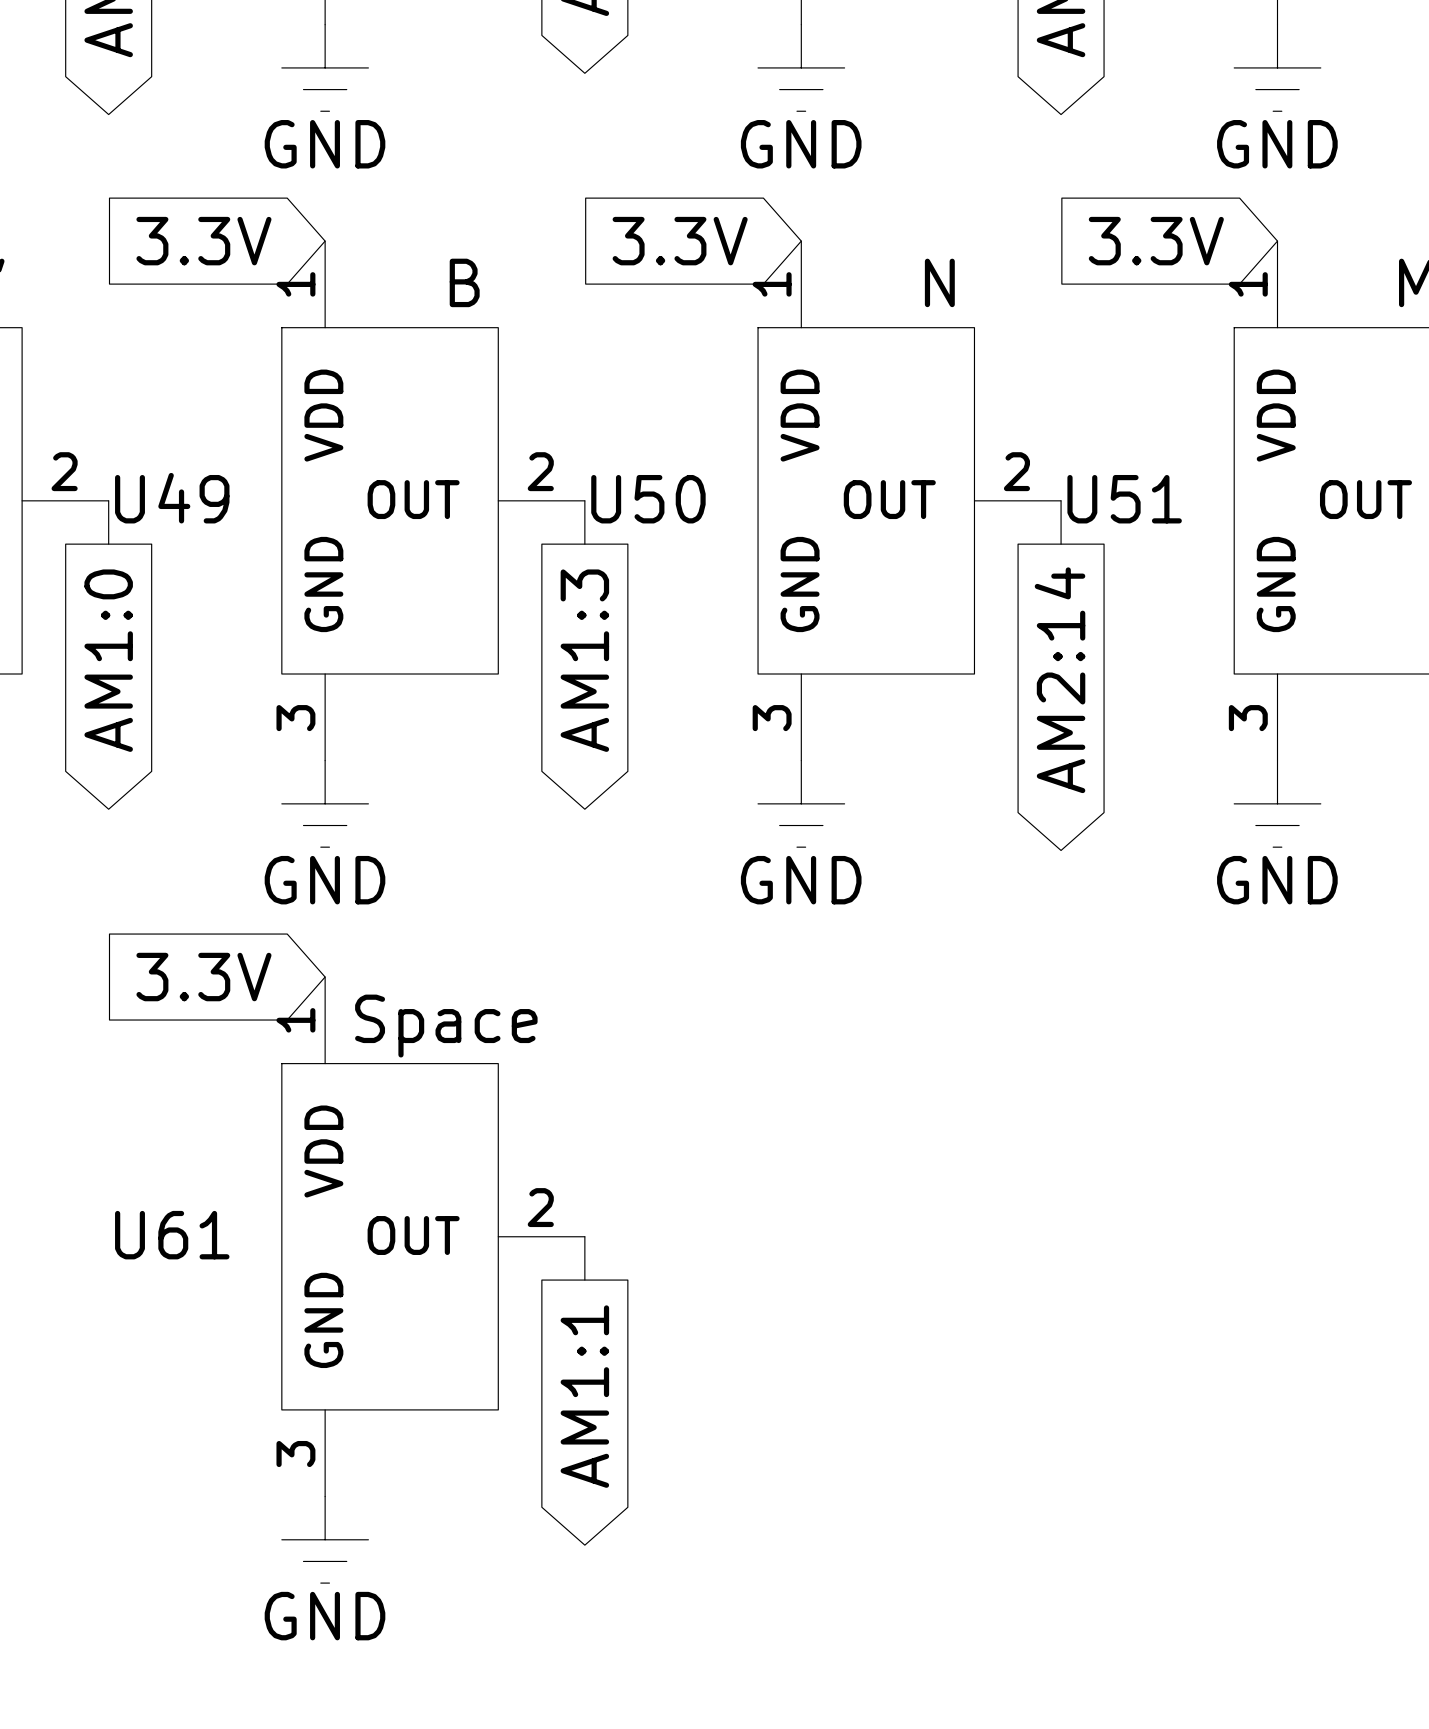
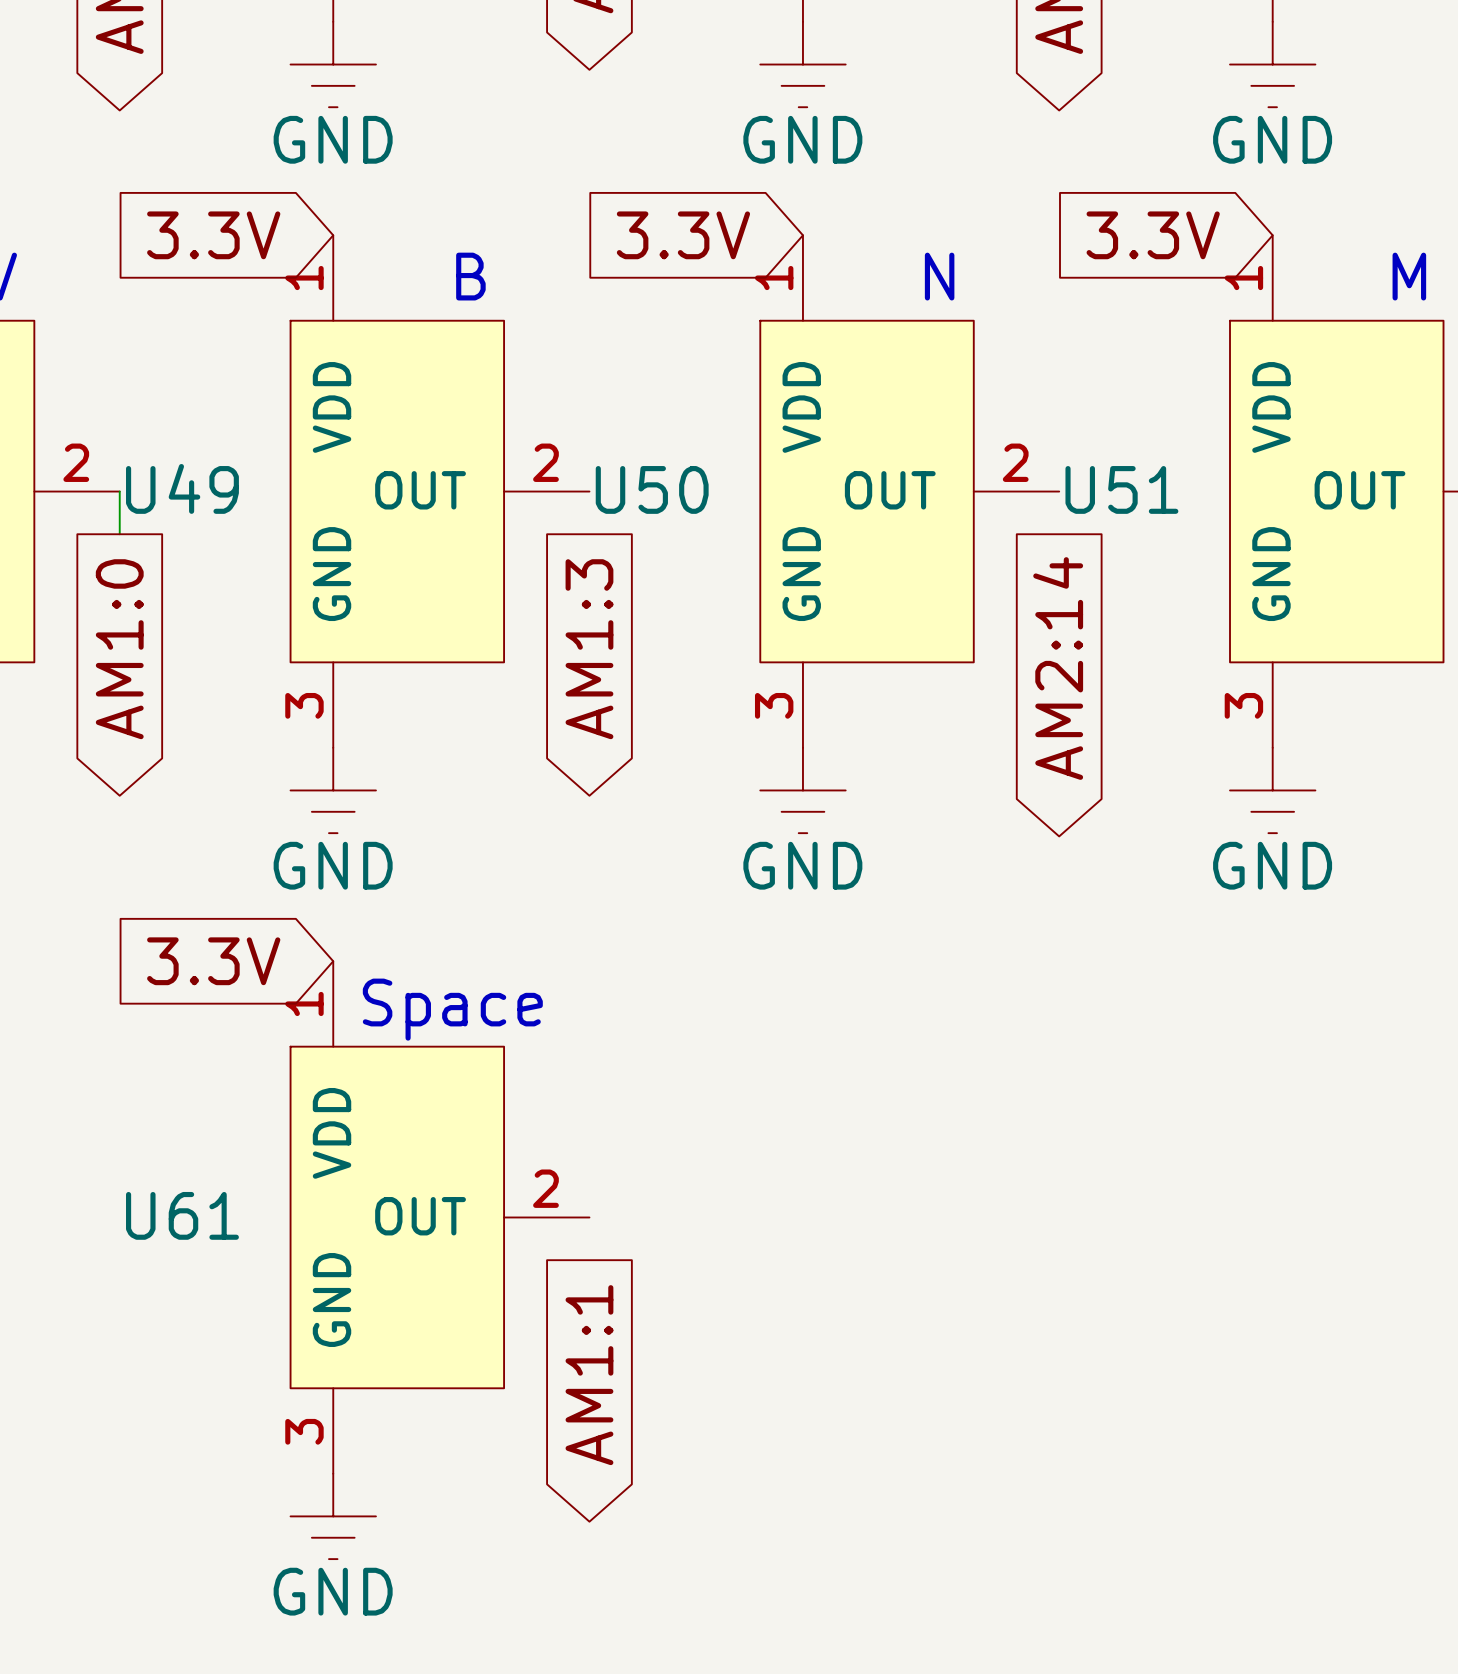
wire: (584, 500) (584, 544) -> none
wire: (1061, 500) (1061, 544) -> none
wire: (584, 1236) (584, 1280) -> none

